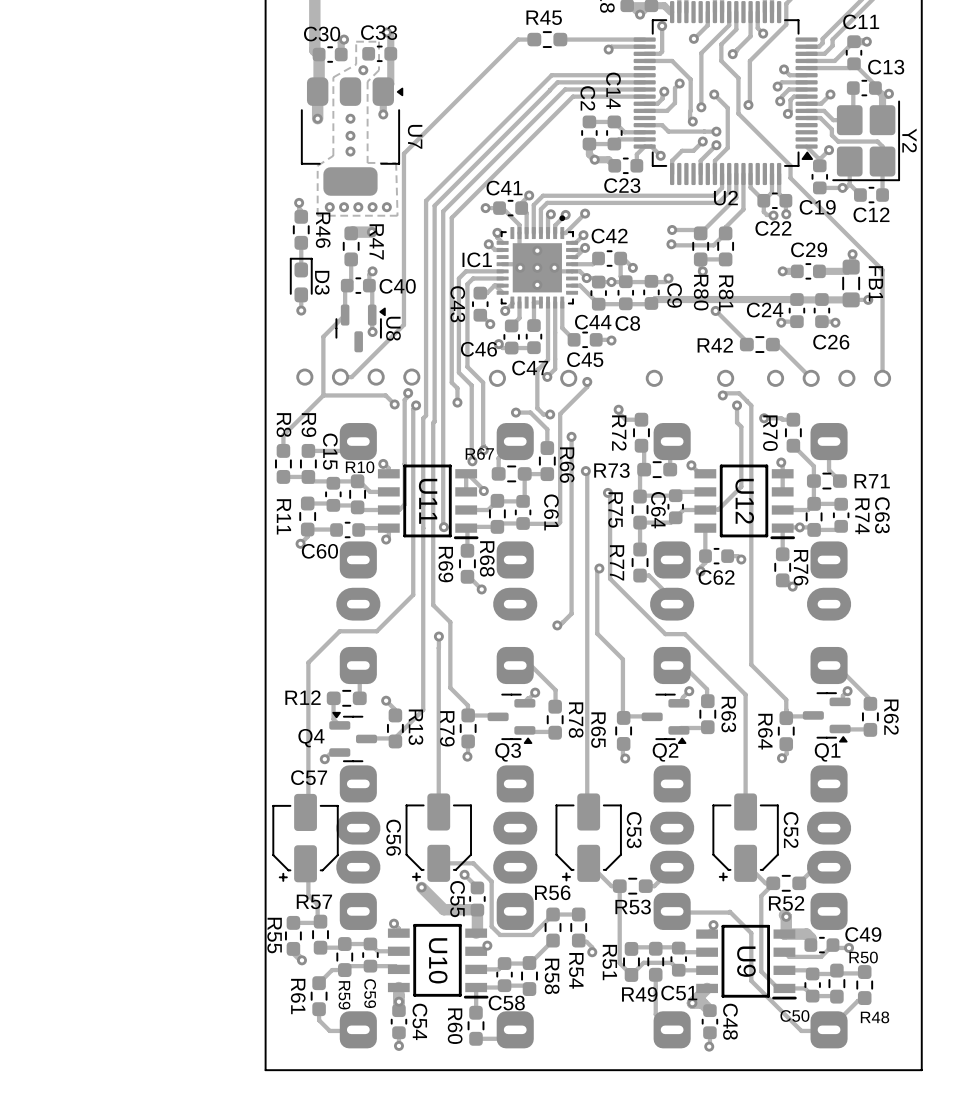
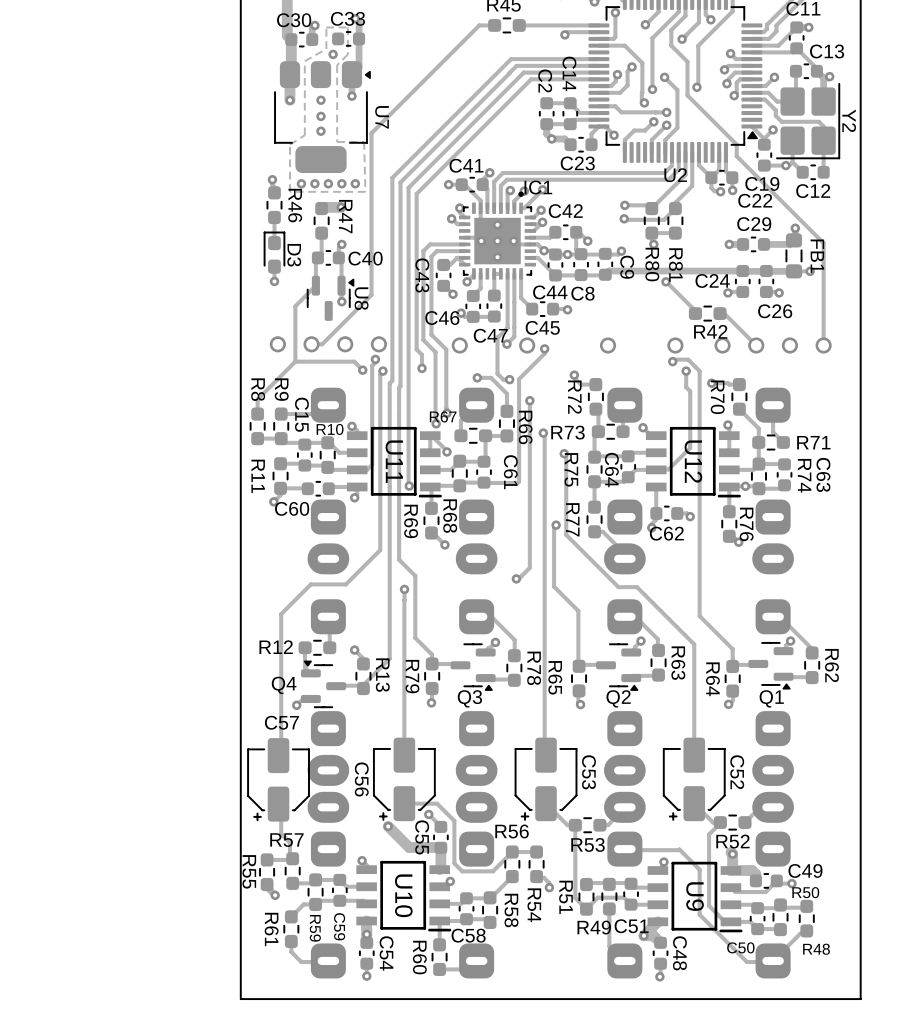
C22 name position: C22 (773, 228) -> C22 (755, 200)
IC1 name position: IC1 (477, 259) -> IC1 (538, 187)
R42 name position: R42 (715, 345) -> R42 (710, 331)

